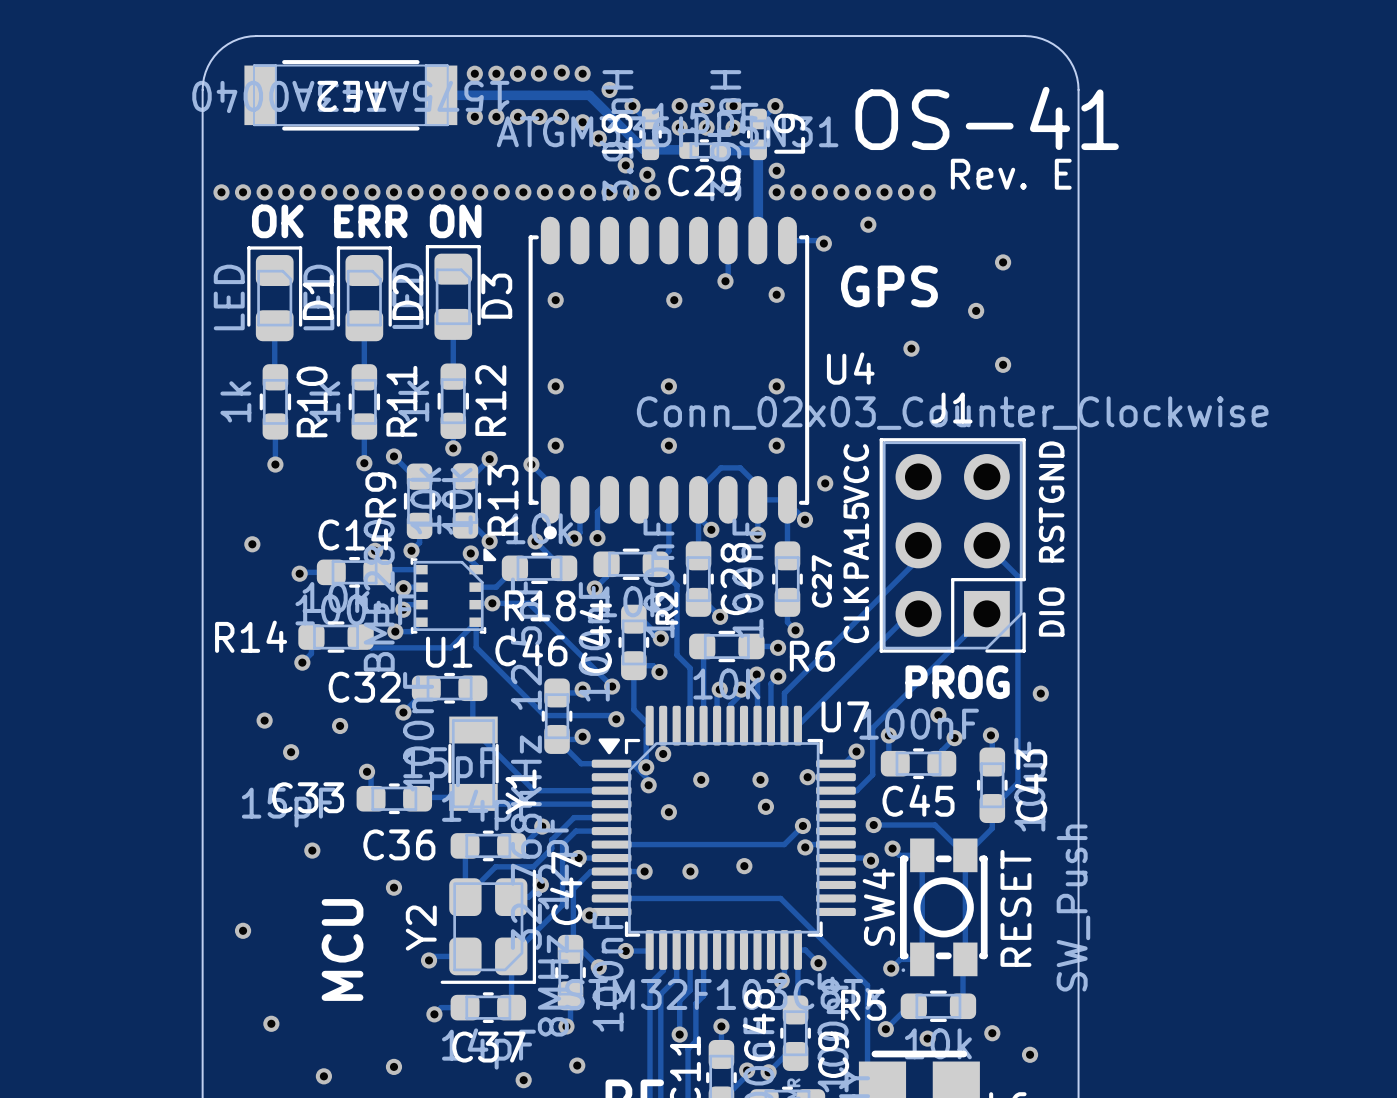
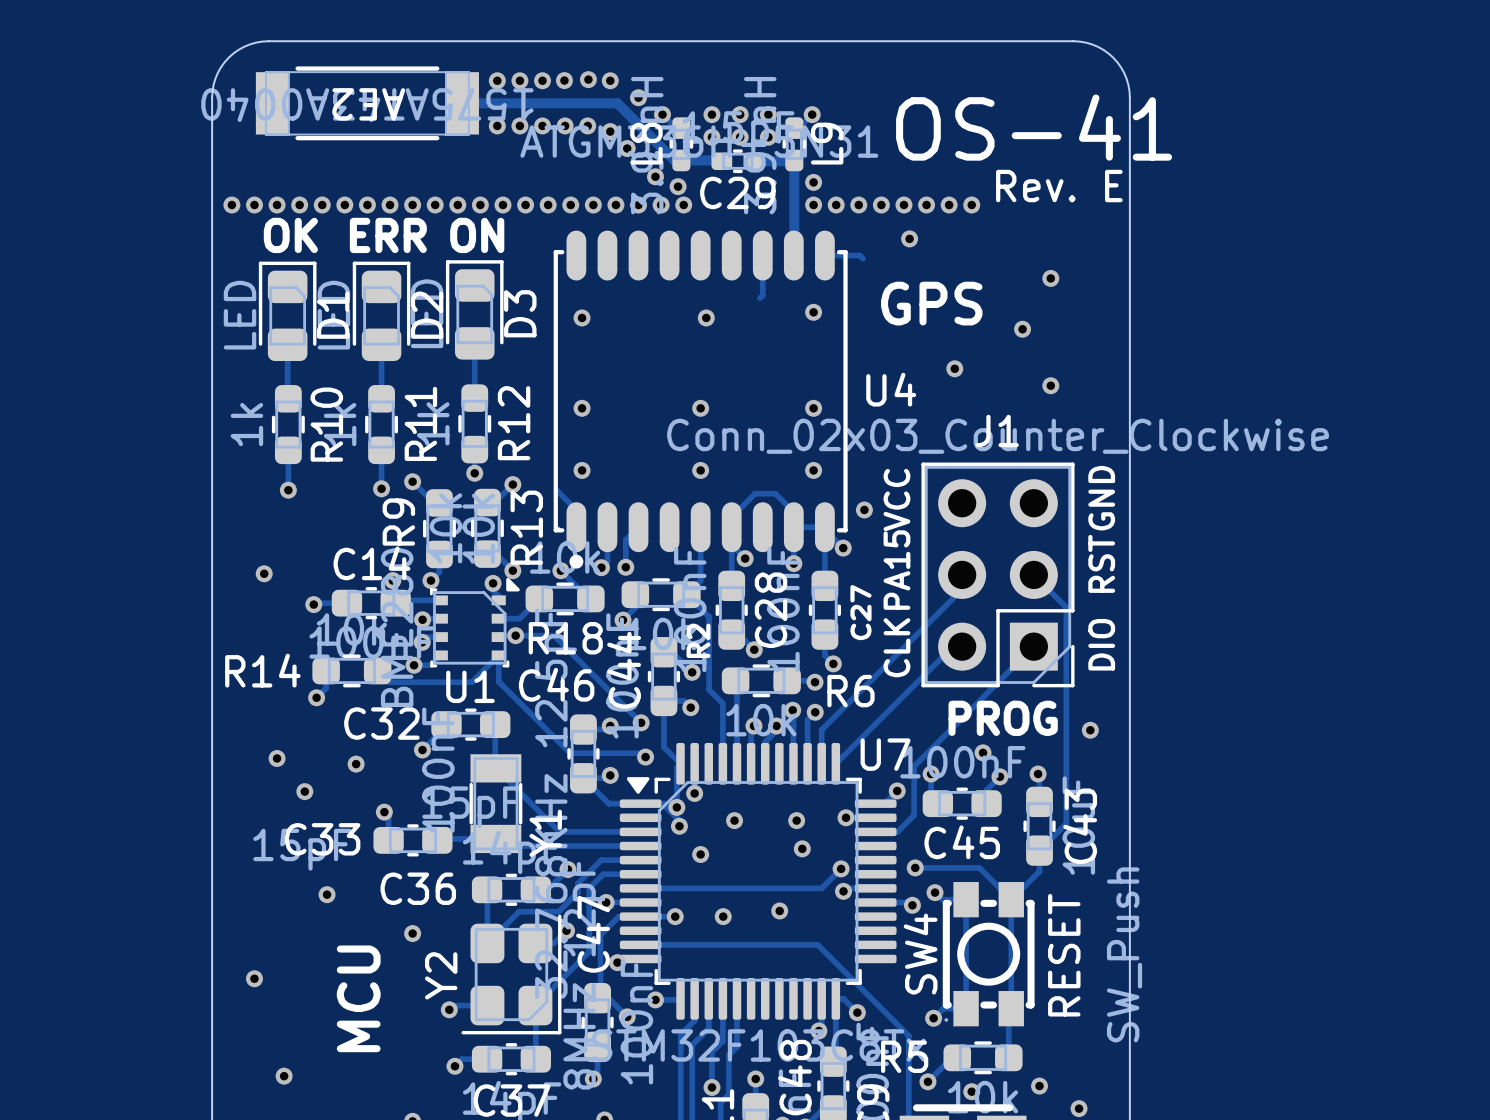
via: (823, 243) -> none
via: (725, 281) -> none
via: (531, 464) -> none

